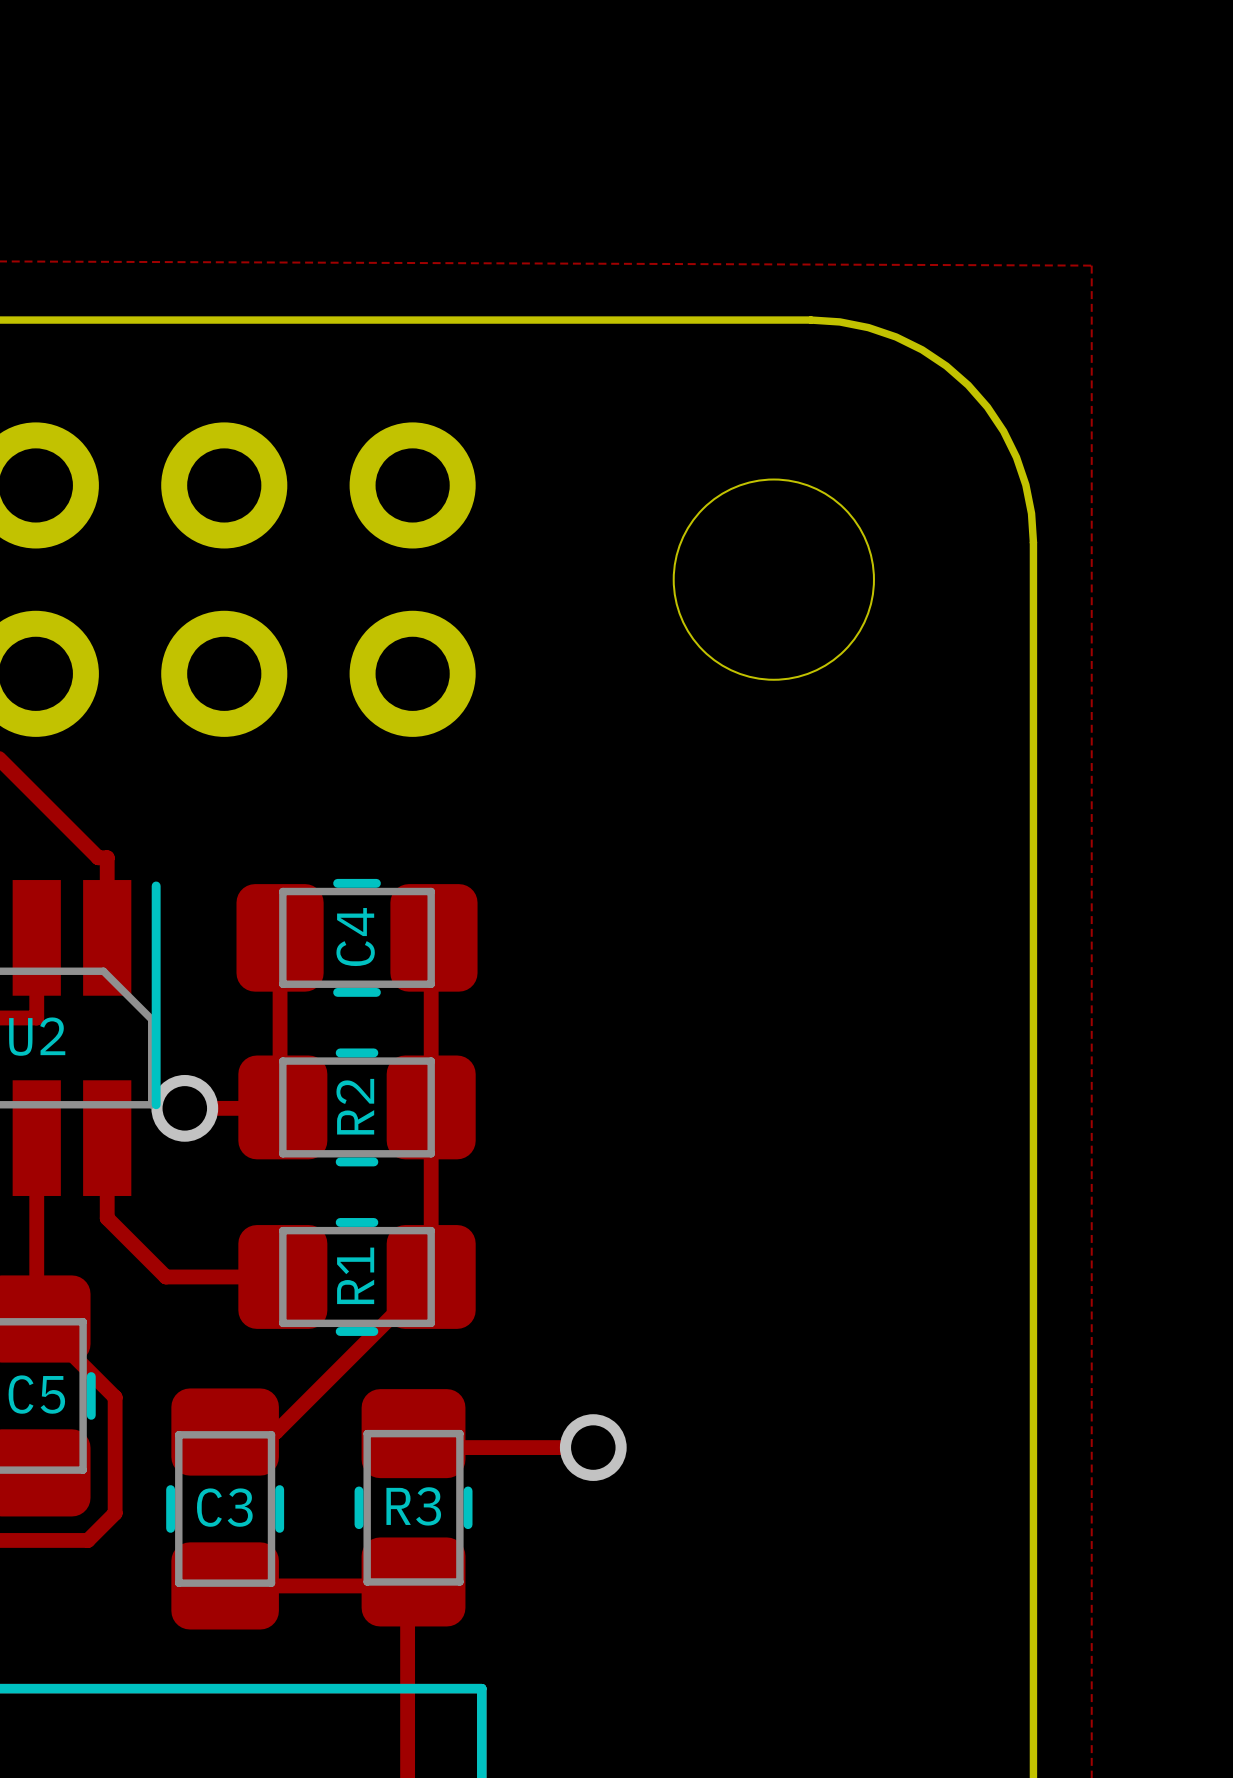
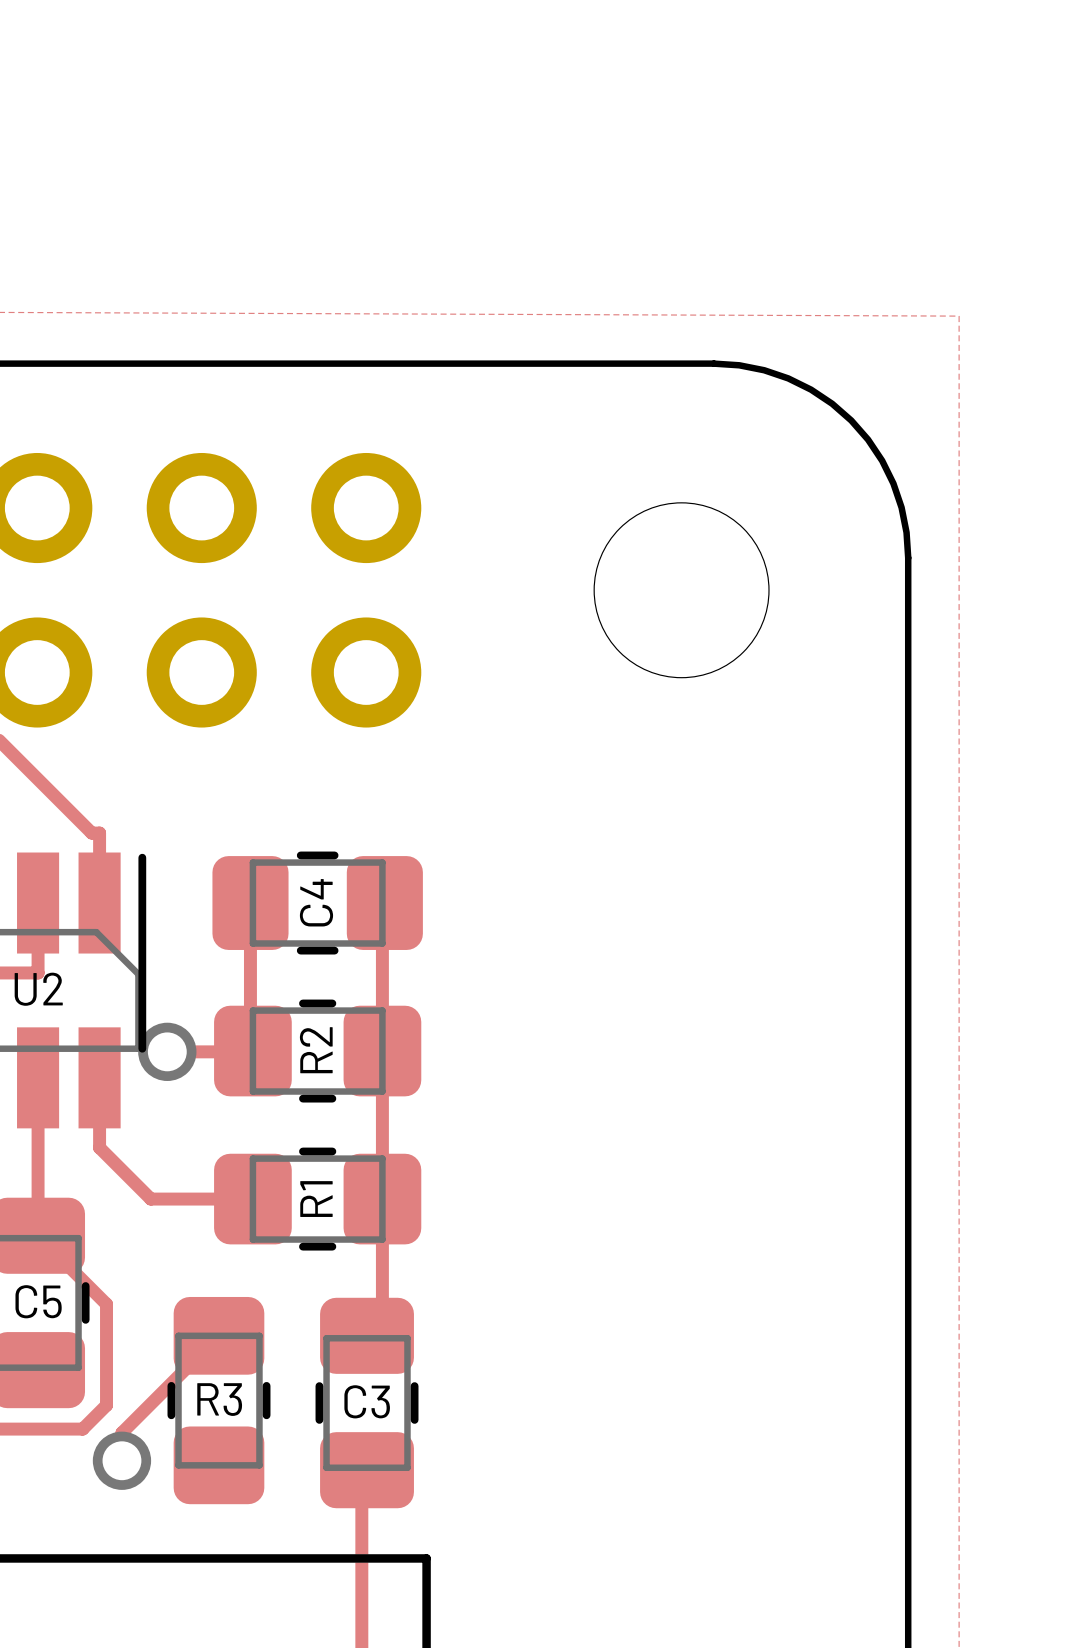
track: (431, 1276) (276, 1432) (225, 1432) -> (382, 1199) (382, 1320)
track: none -> (218, 1335) (121, 1432) (121, 1460)
track: (427, 1447) (593, 1447) -> none
via: (593, 1447) -> none
R3 position: (413, 1507) -> (218, 1400)
C3 position: (225, 1508) -> (367, 1403)
via: none -> (121, 1460)
track: (225, 1585) (407, 1585) (407, 1593) -> none

